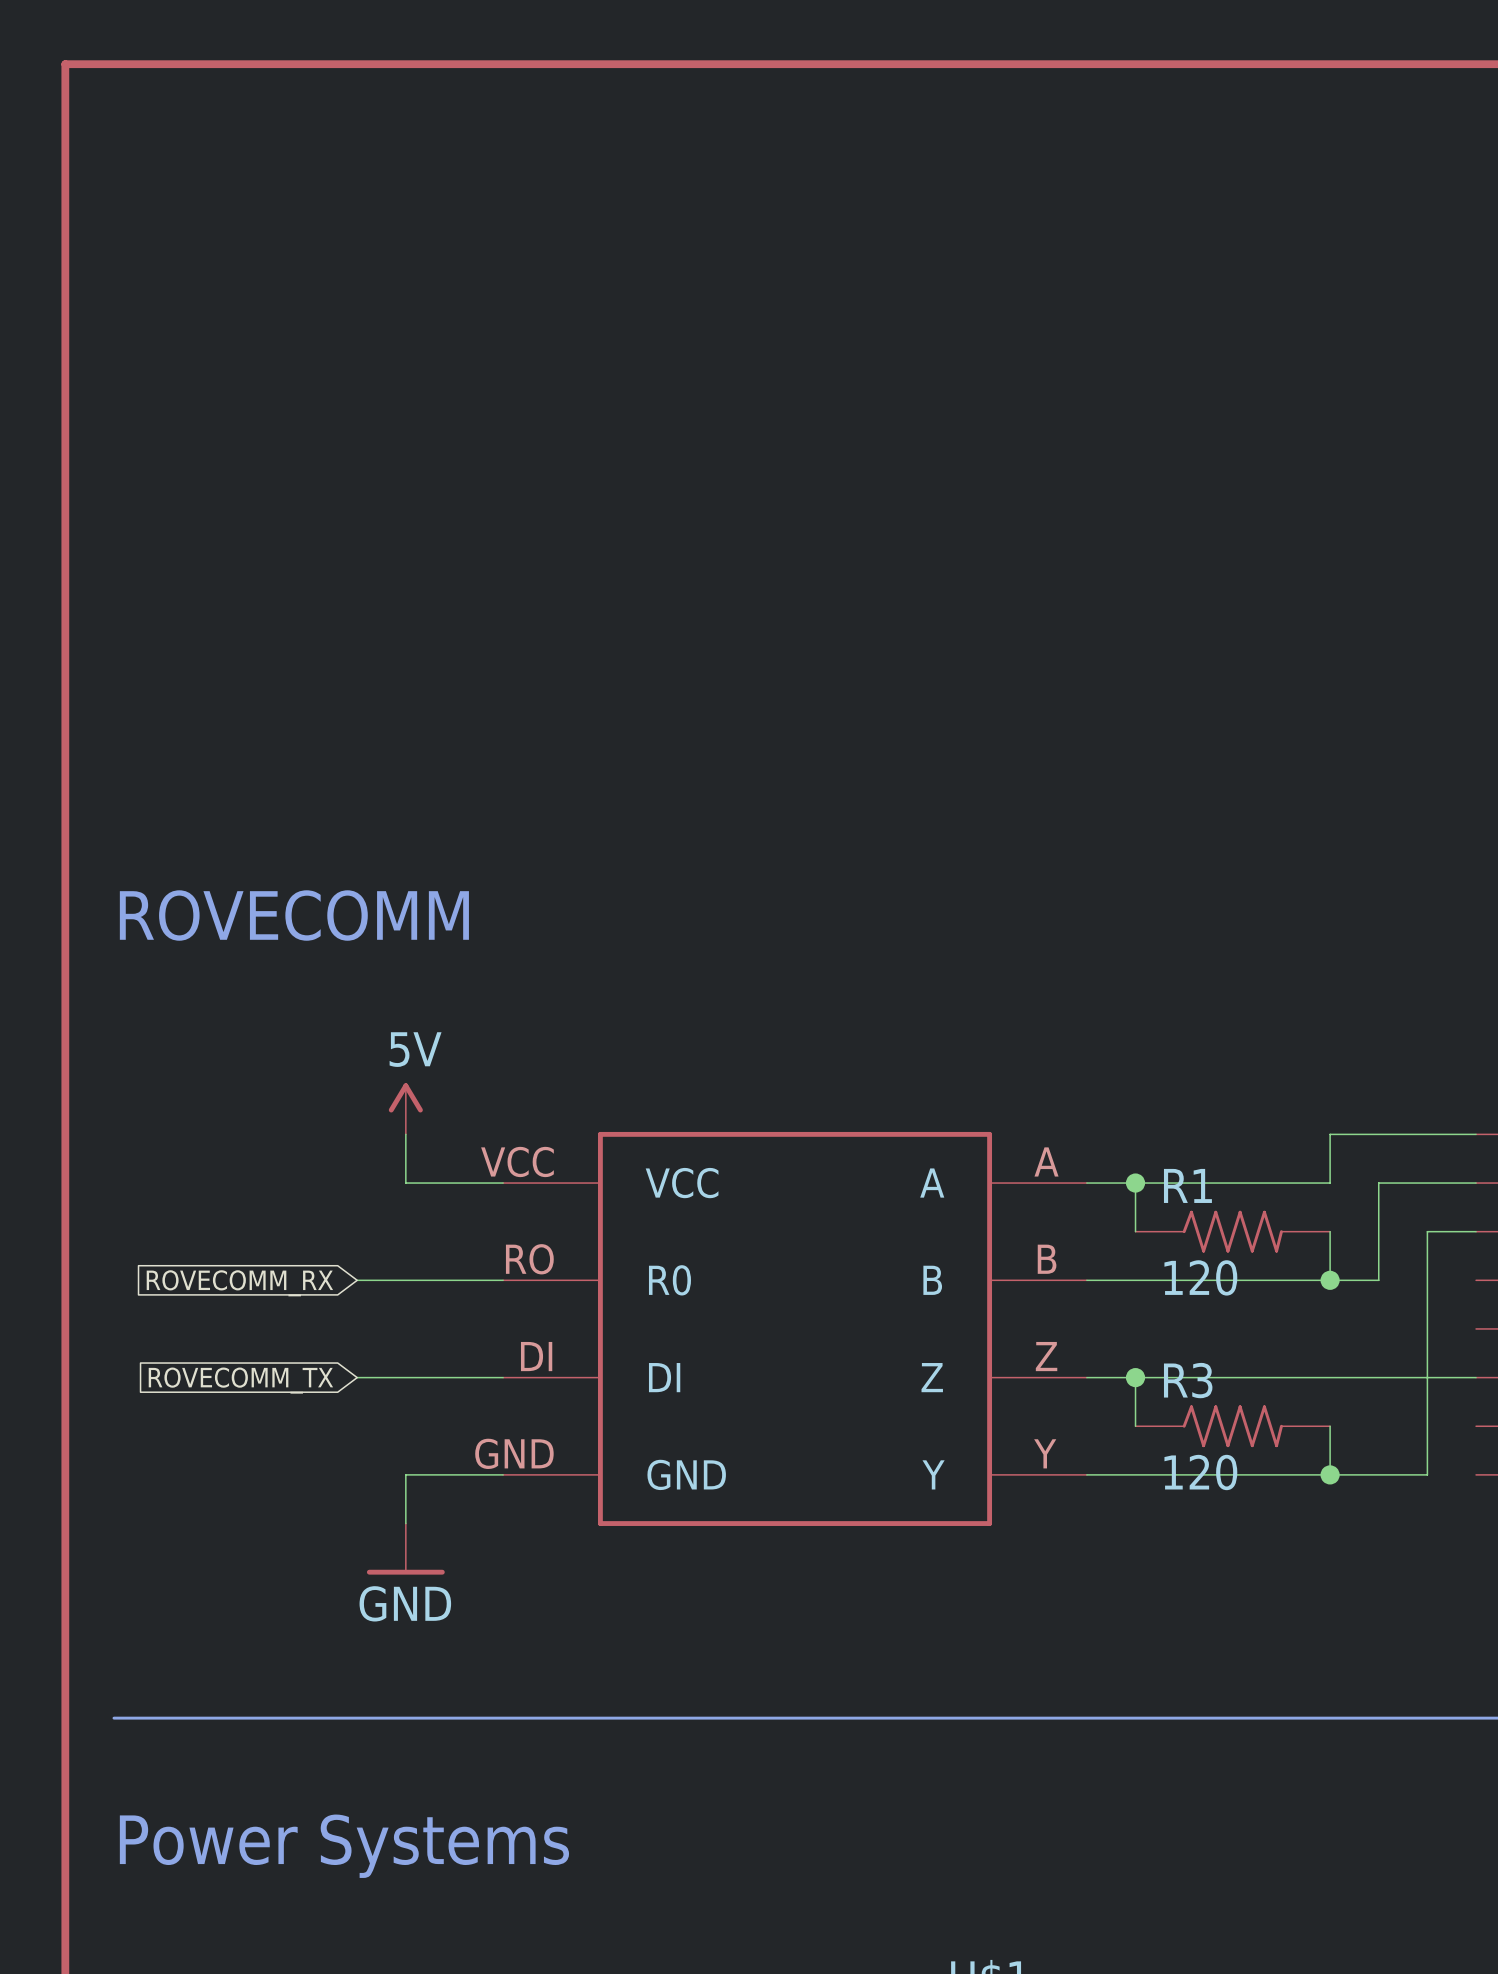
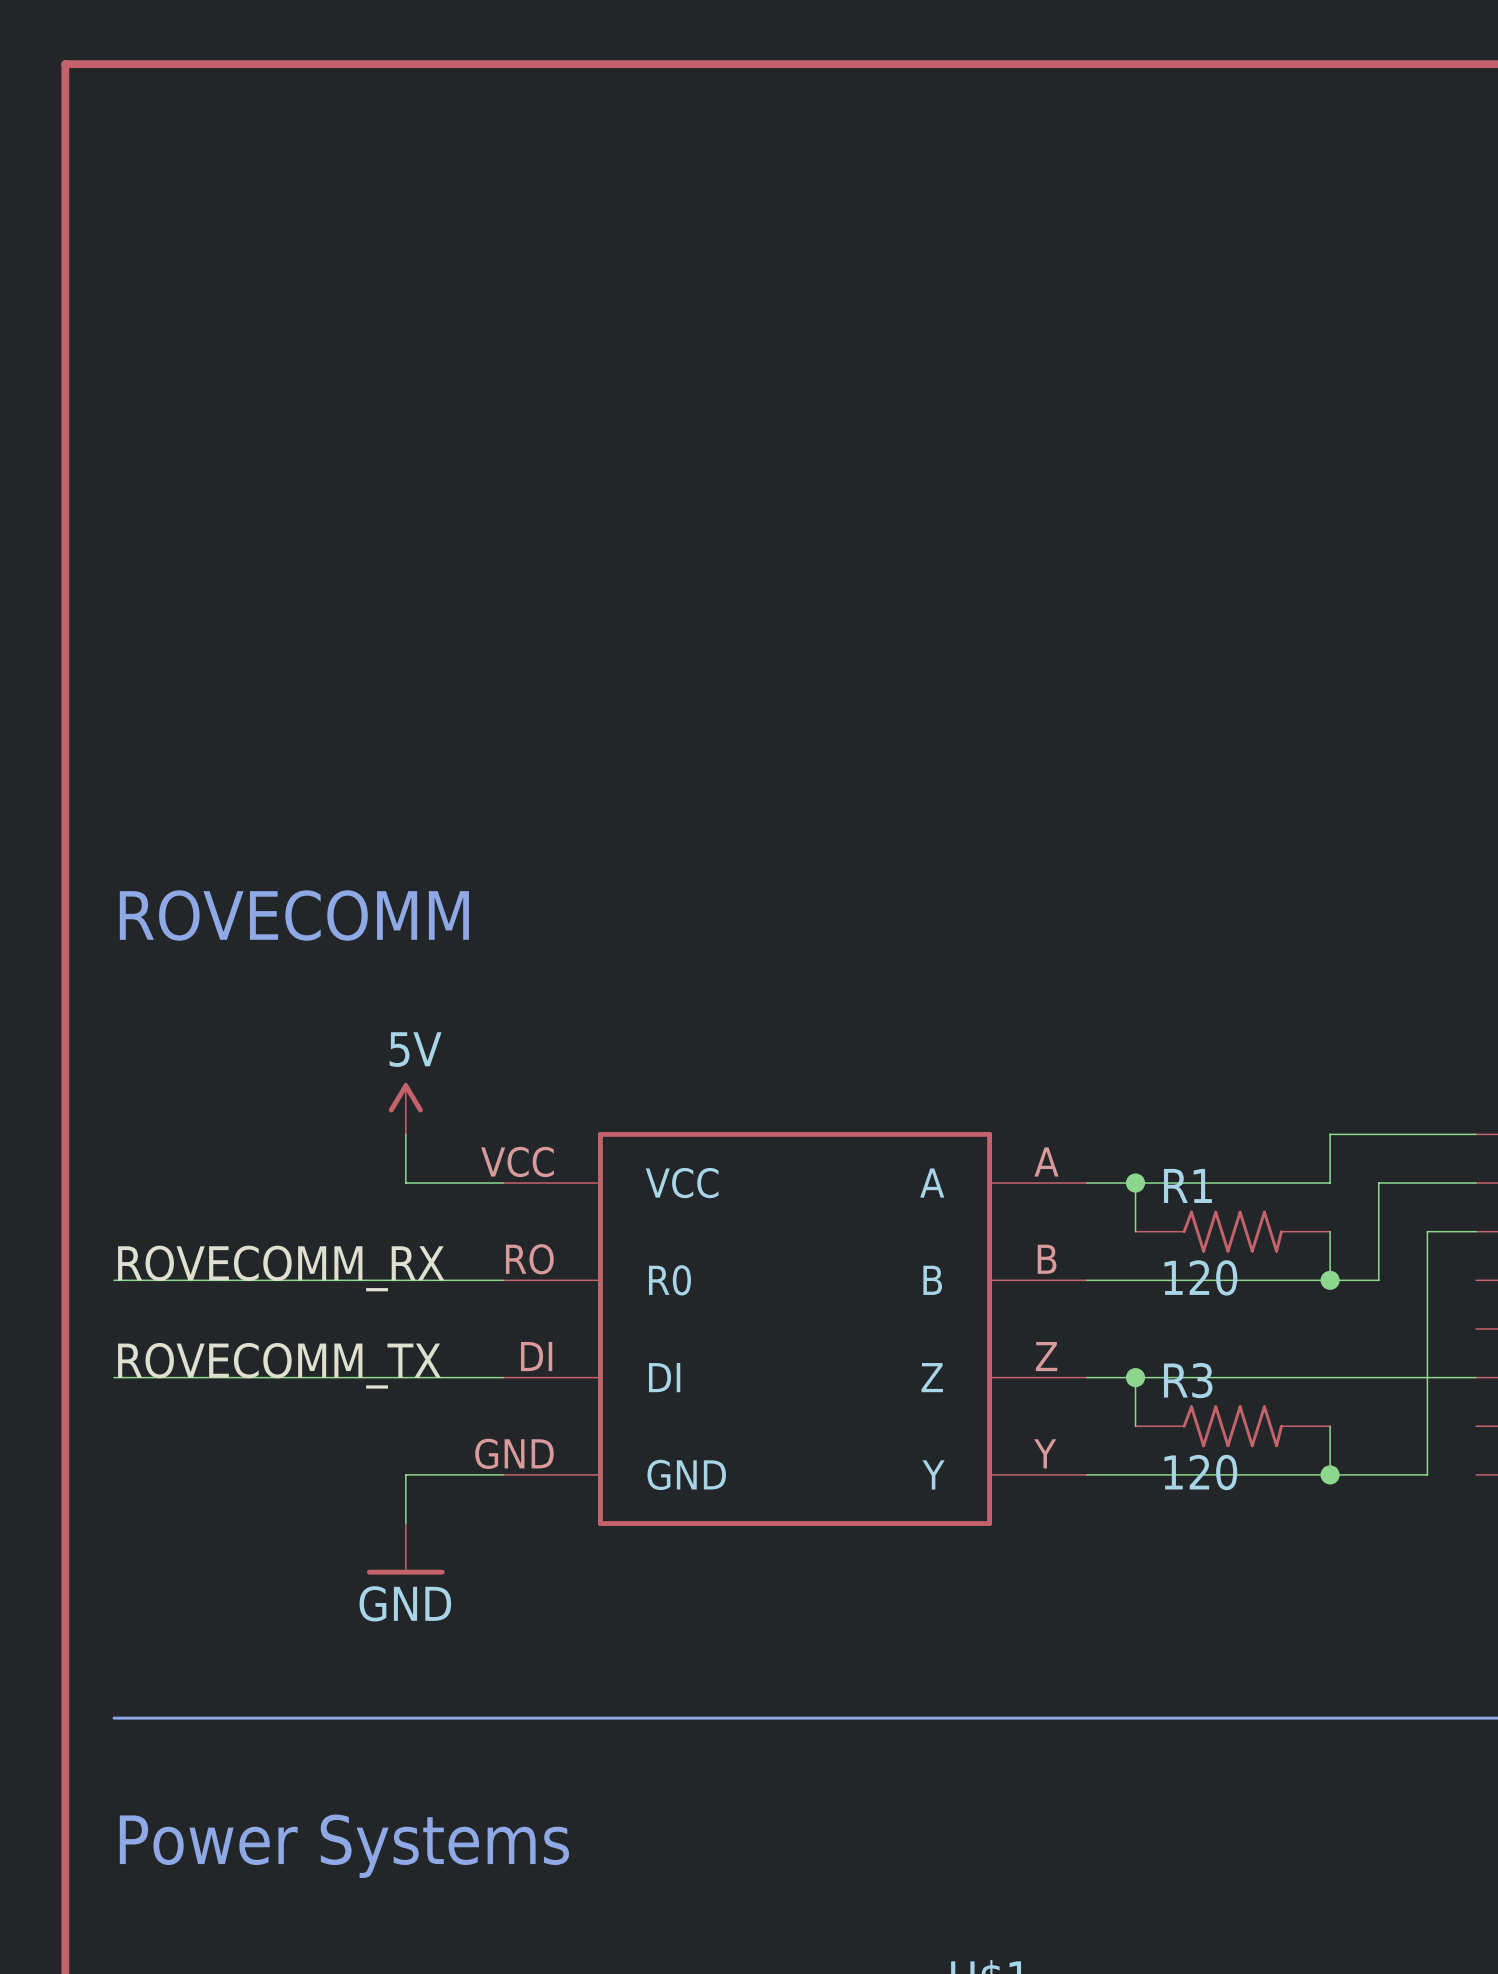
label: none -> ROVECOMM_RX (281, 1268)
wire: none -> (113, 1280) (357, 1280)
global label: ROVECOMM_RX (239, 1283) -> none
label: none -> ROVECOMM_TX (279, 1365)
wire: none -> (113, 1377) (357, 1377)
global label: ROVECOMM_TX (240, 1380) -> none

